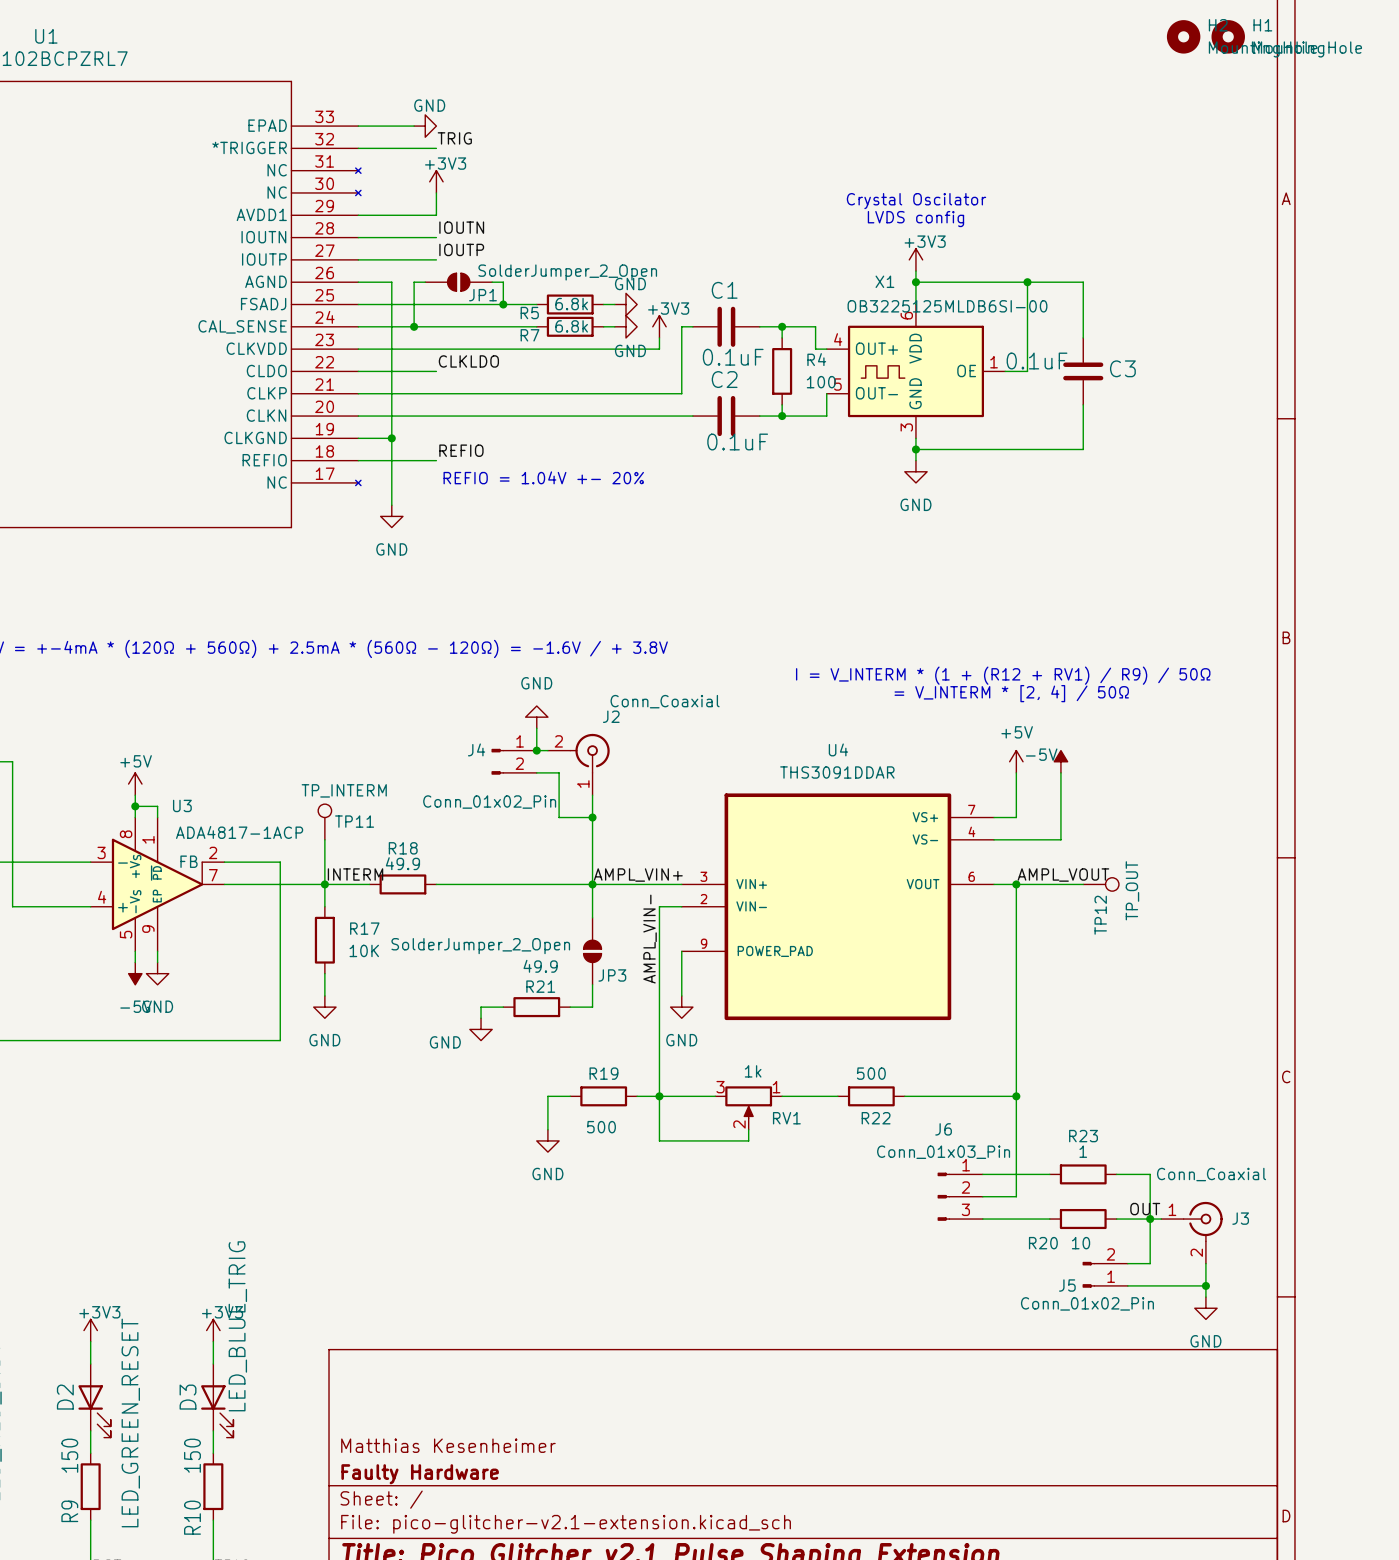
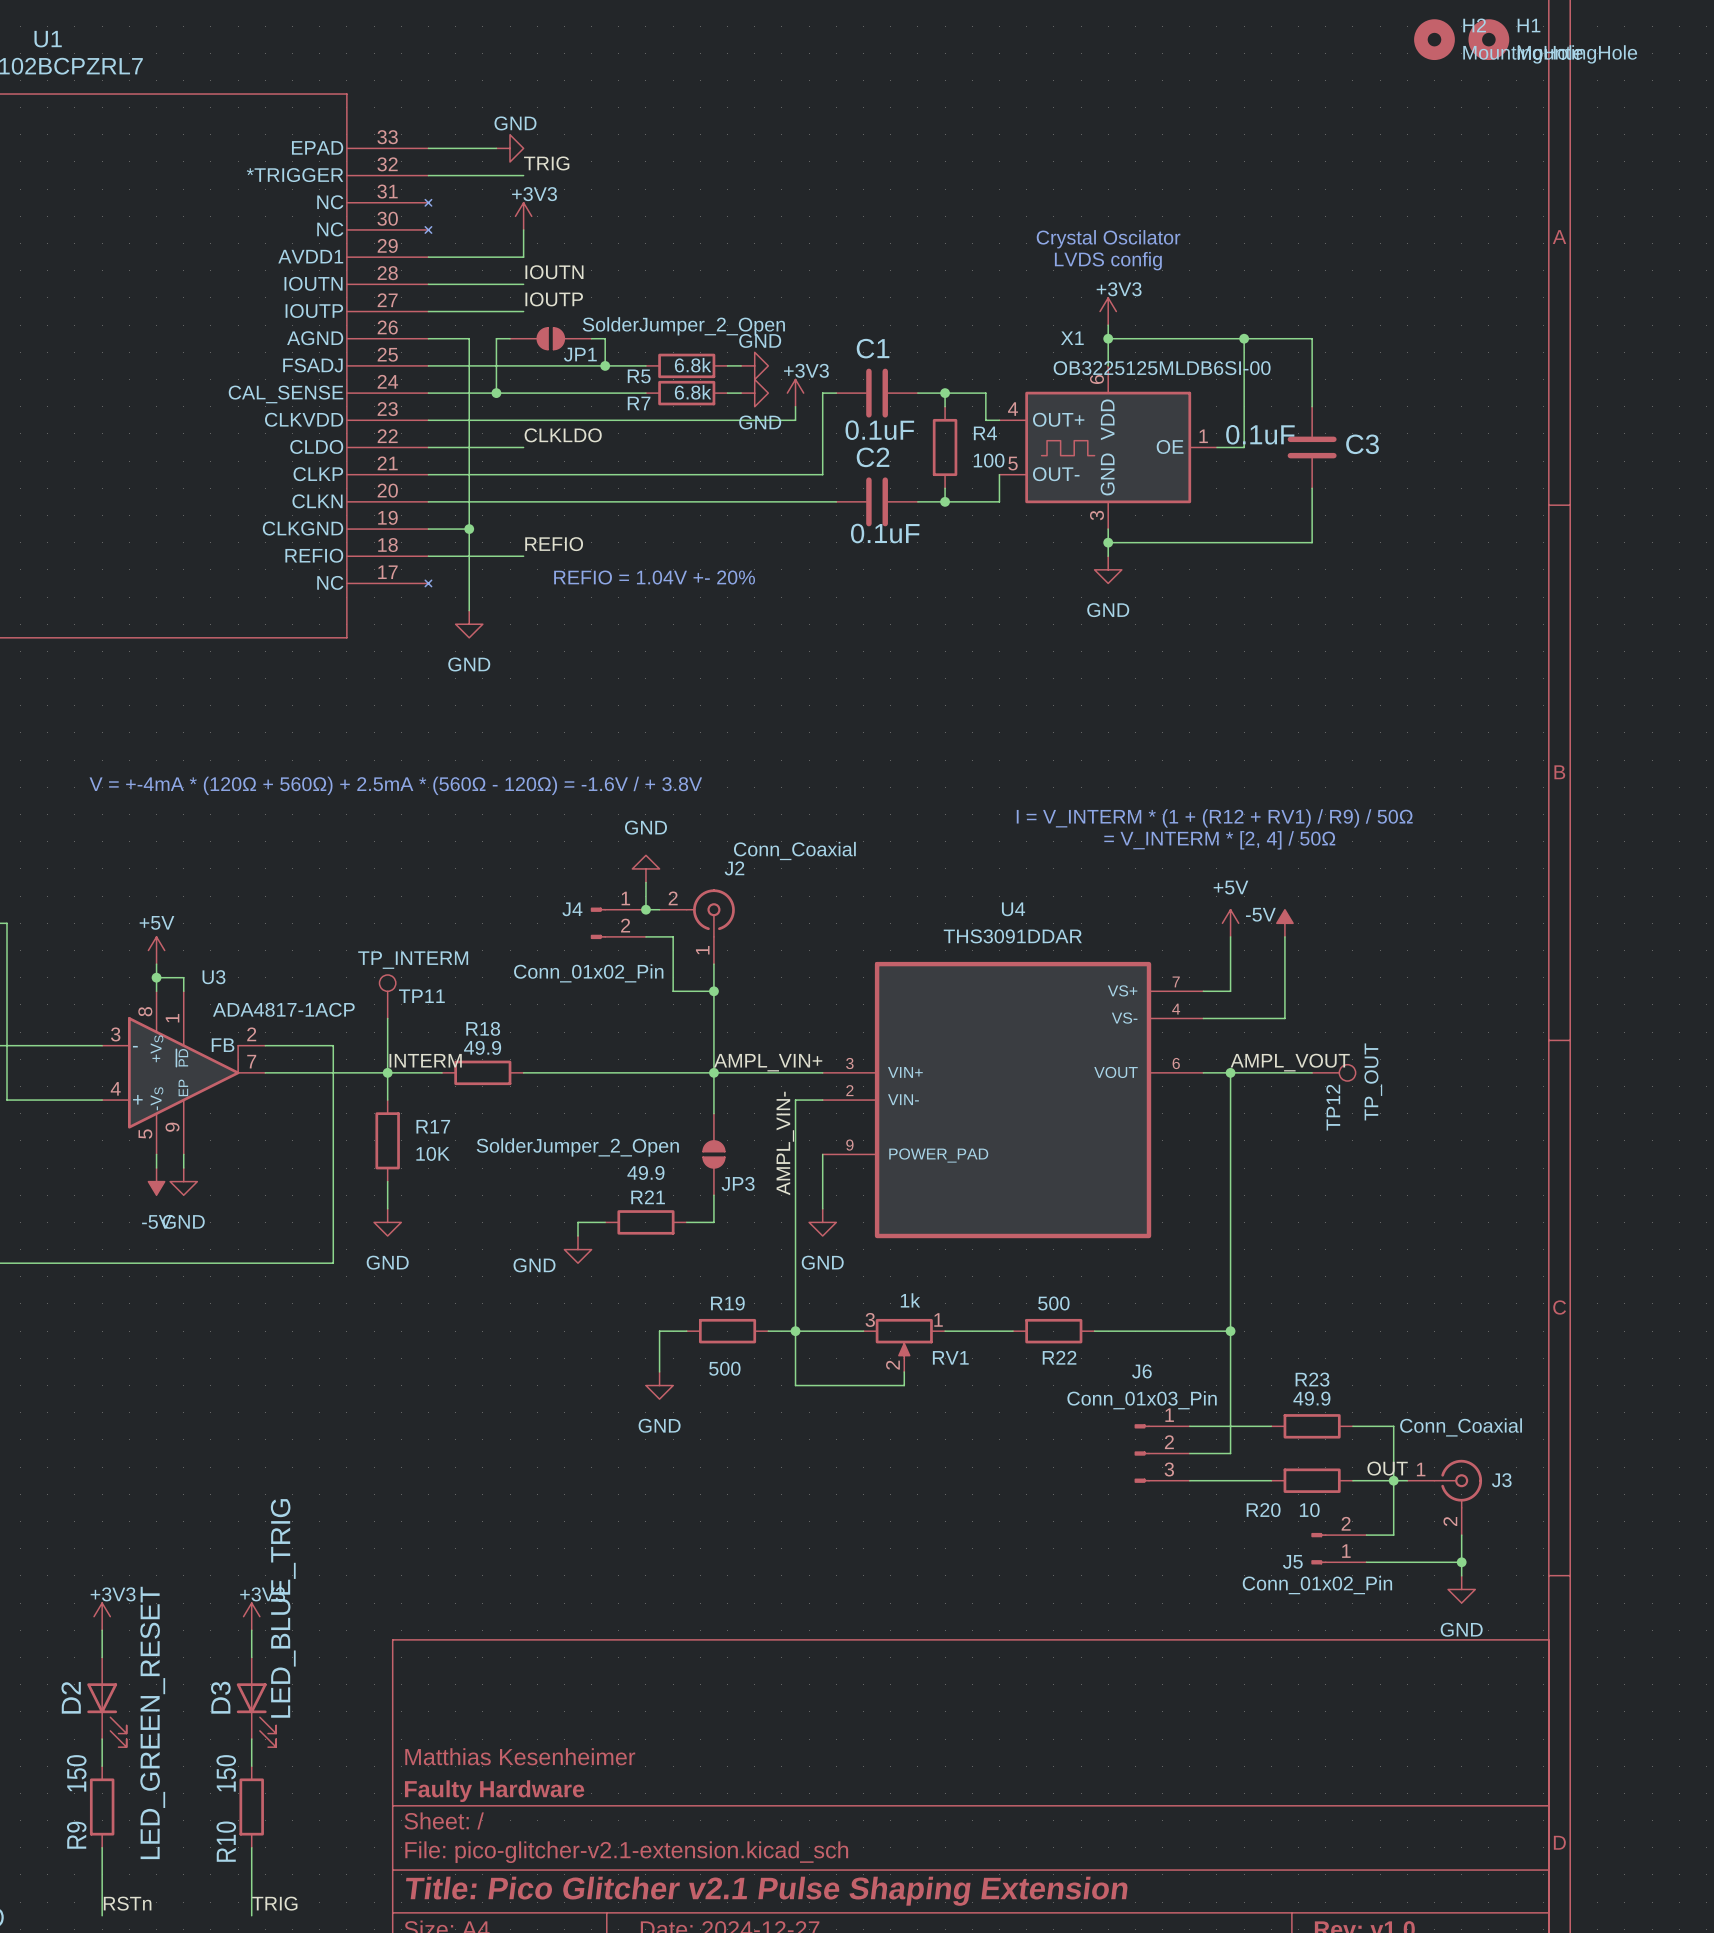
R23 value: 1 (1083, 1151) -> 49.9 (1311, 1398)

